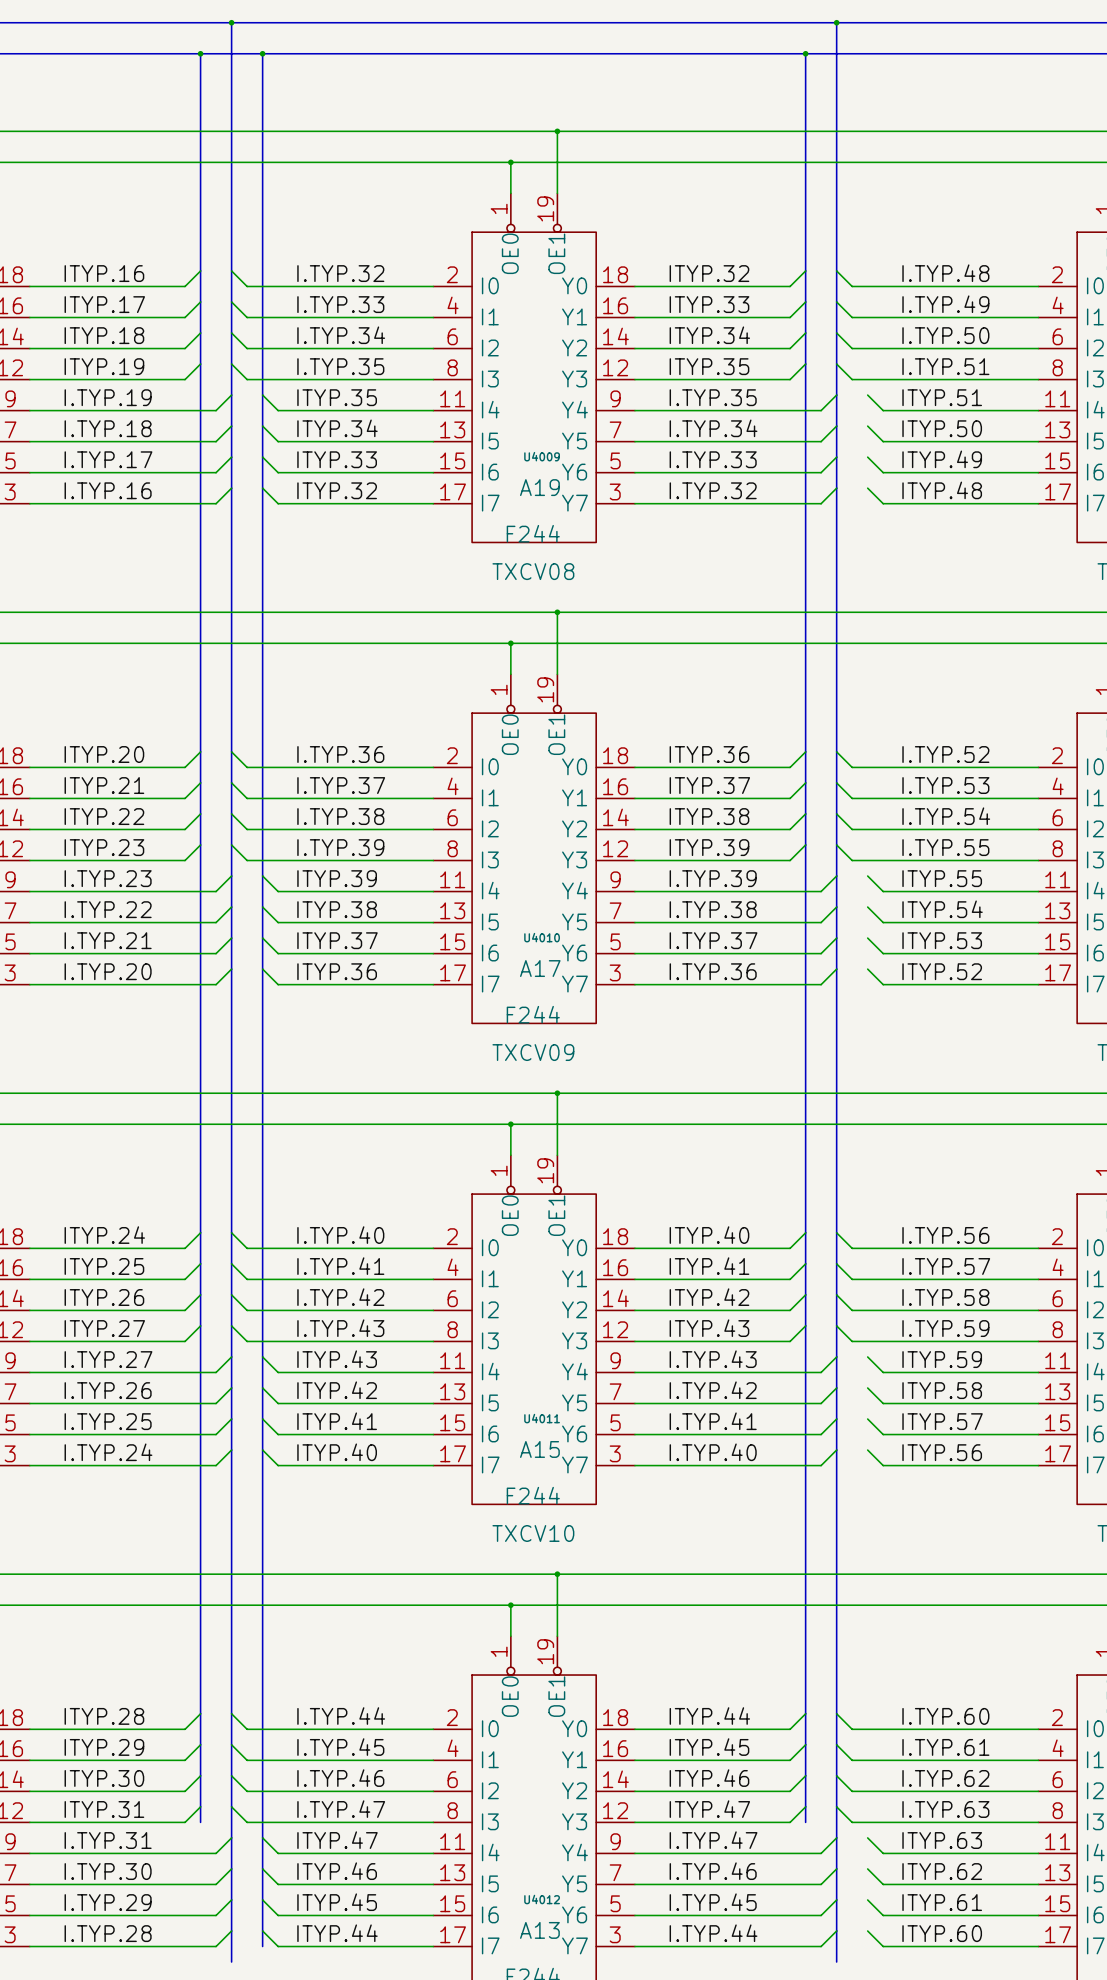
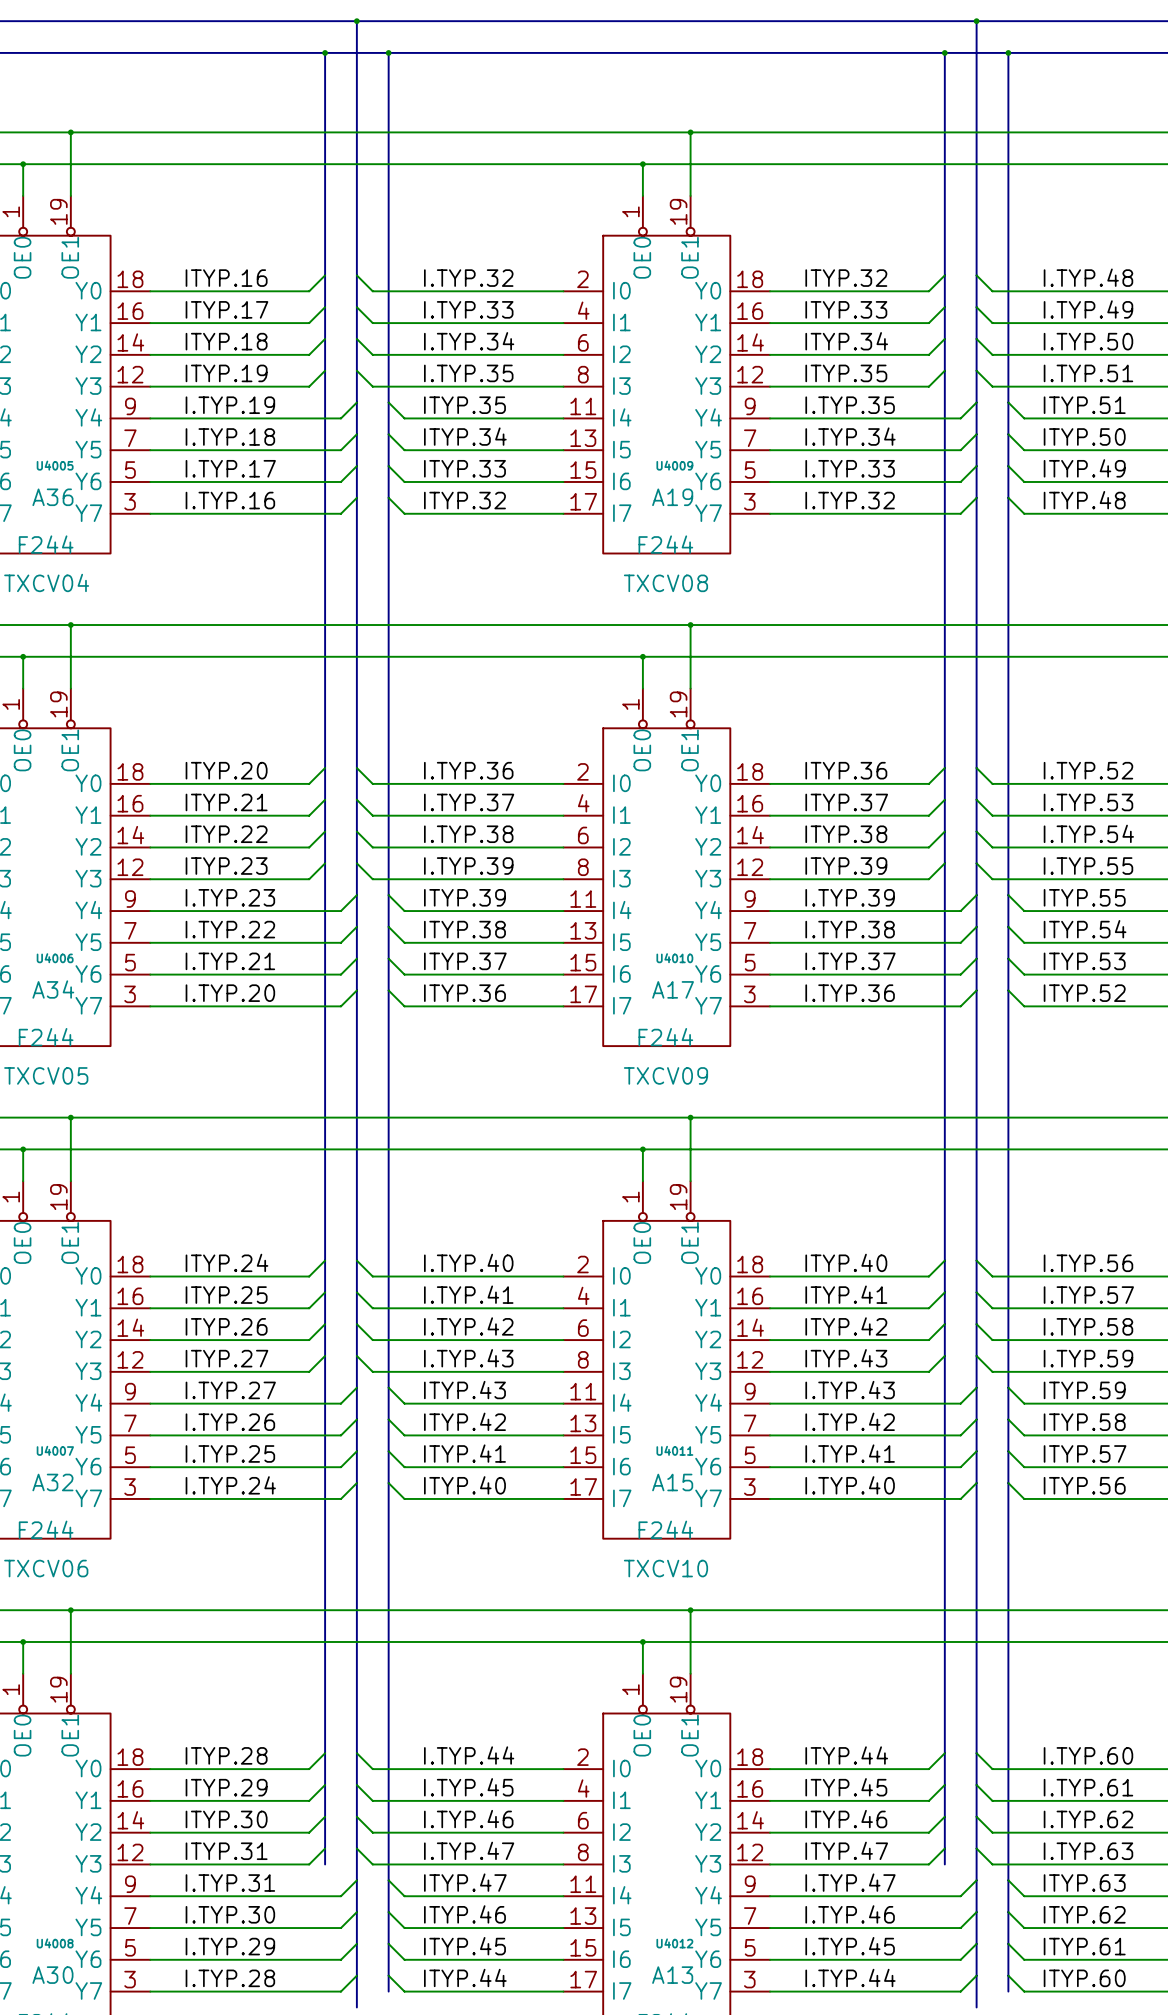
bus: none -> (1008, 52) (1008, 1991)
junction: none -> (1008, 52)

